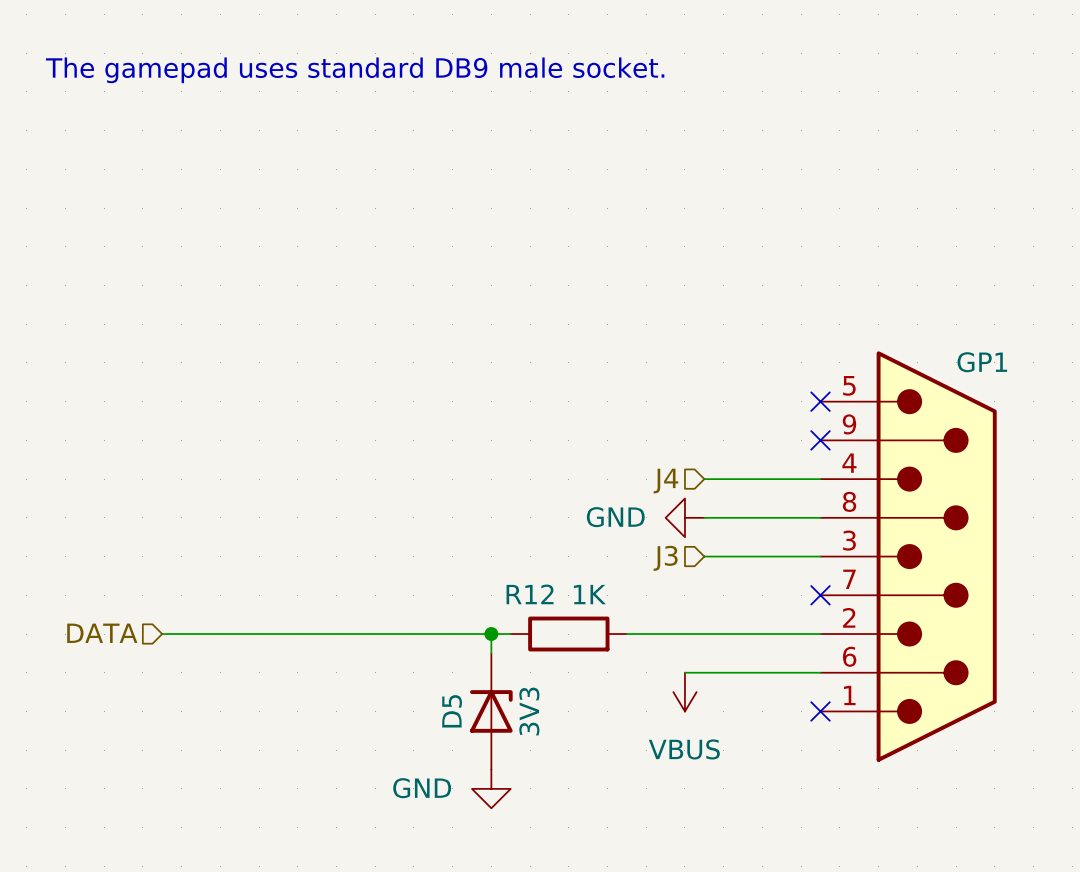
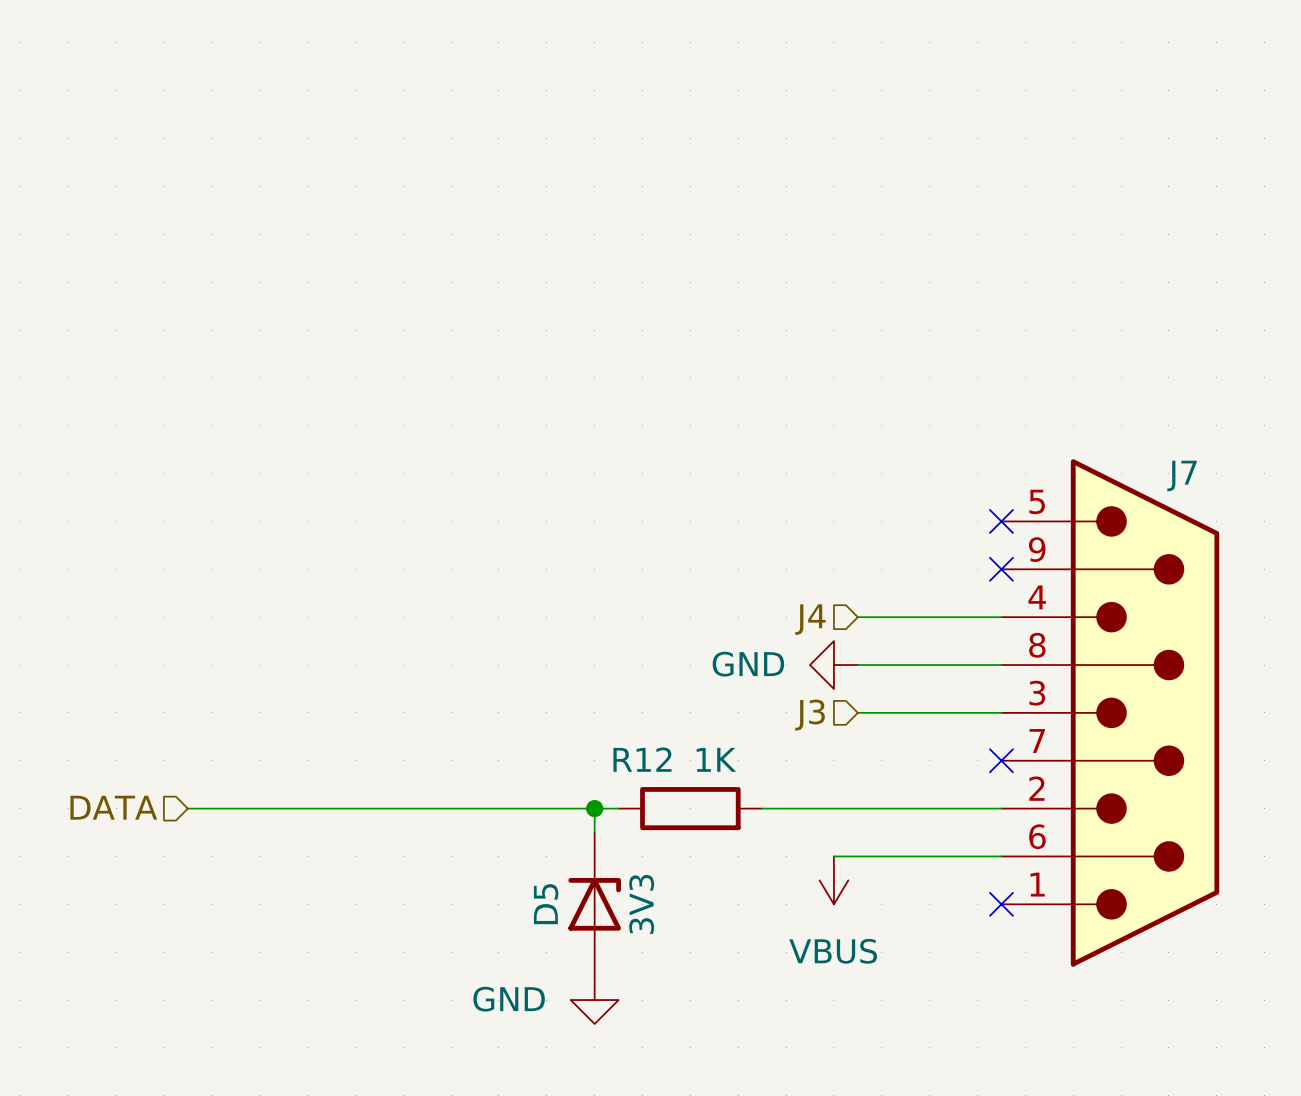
text: The gamepad uses standard DB9 male socket. (355, 70) -> none
GP1 name: GP1 (982, 362) -> J7 (1181, 475)

